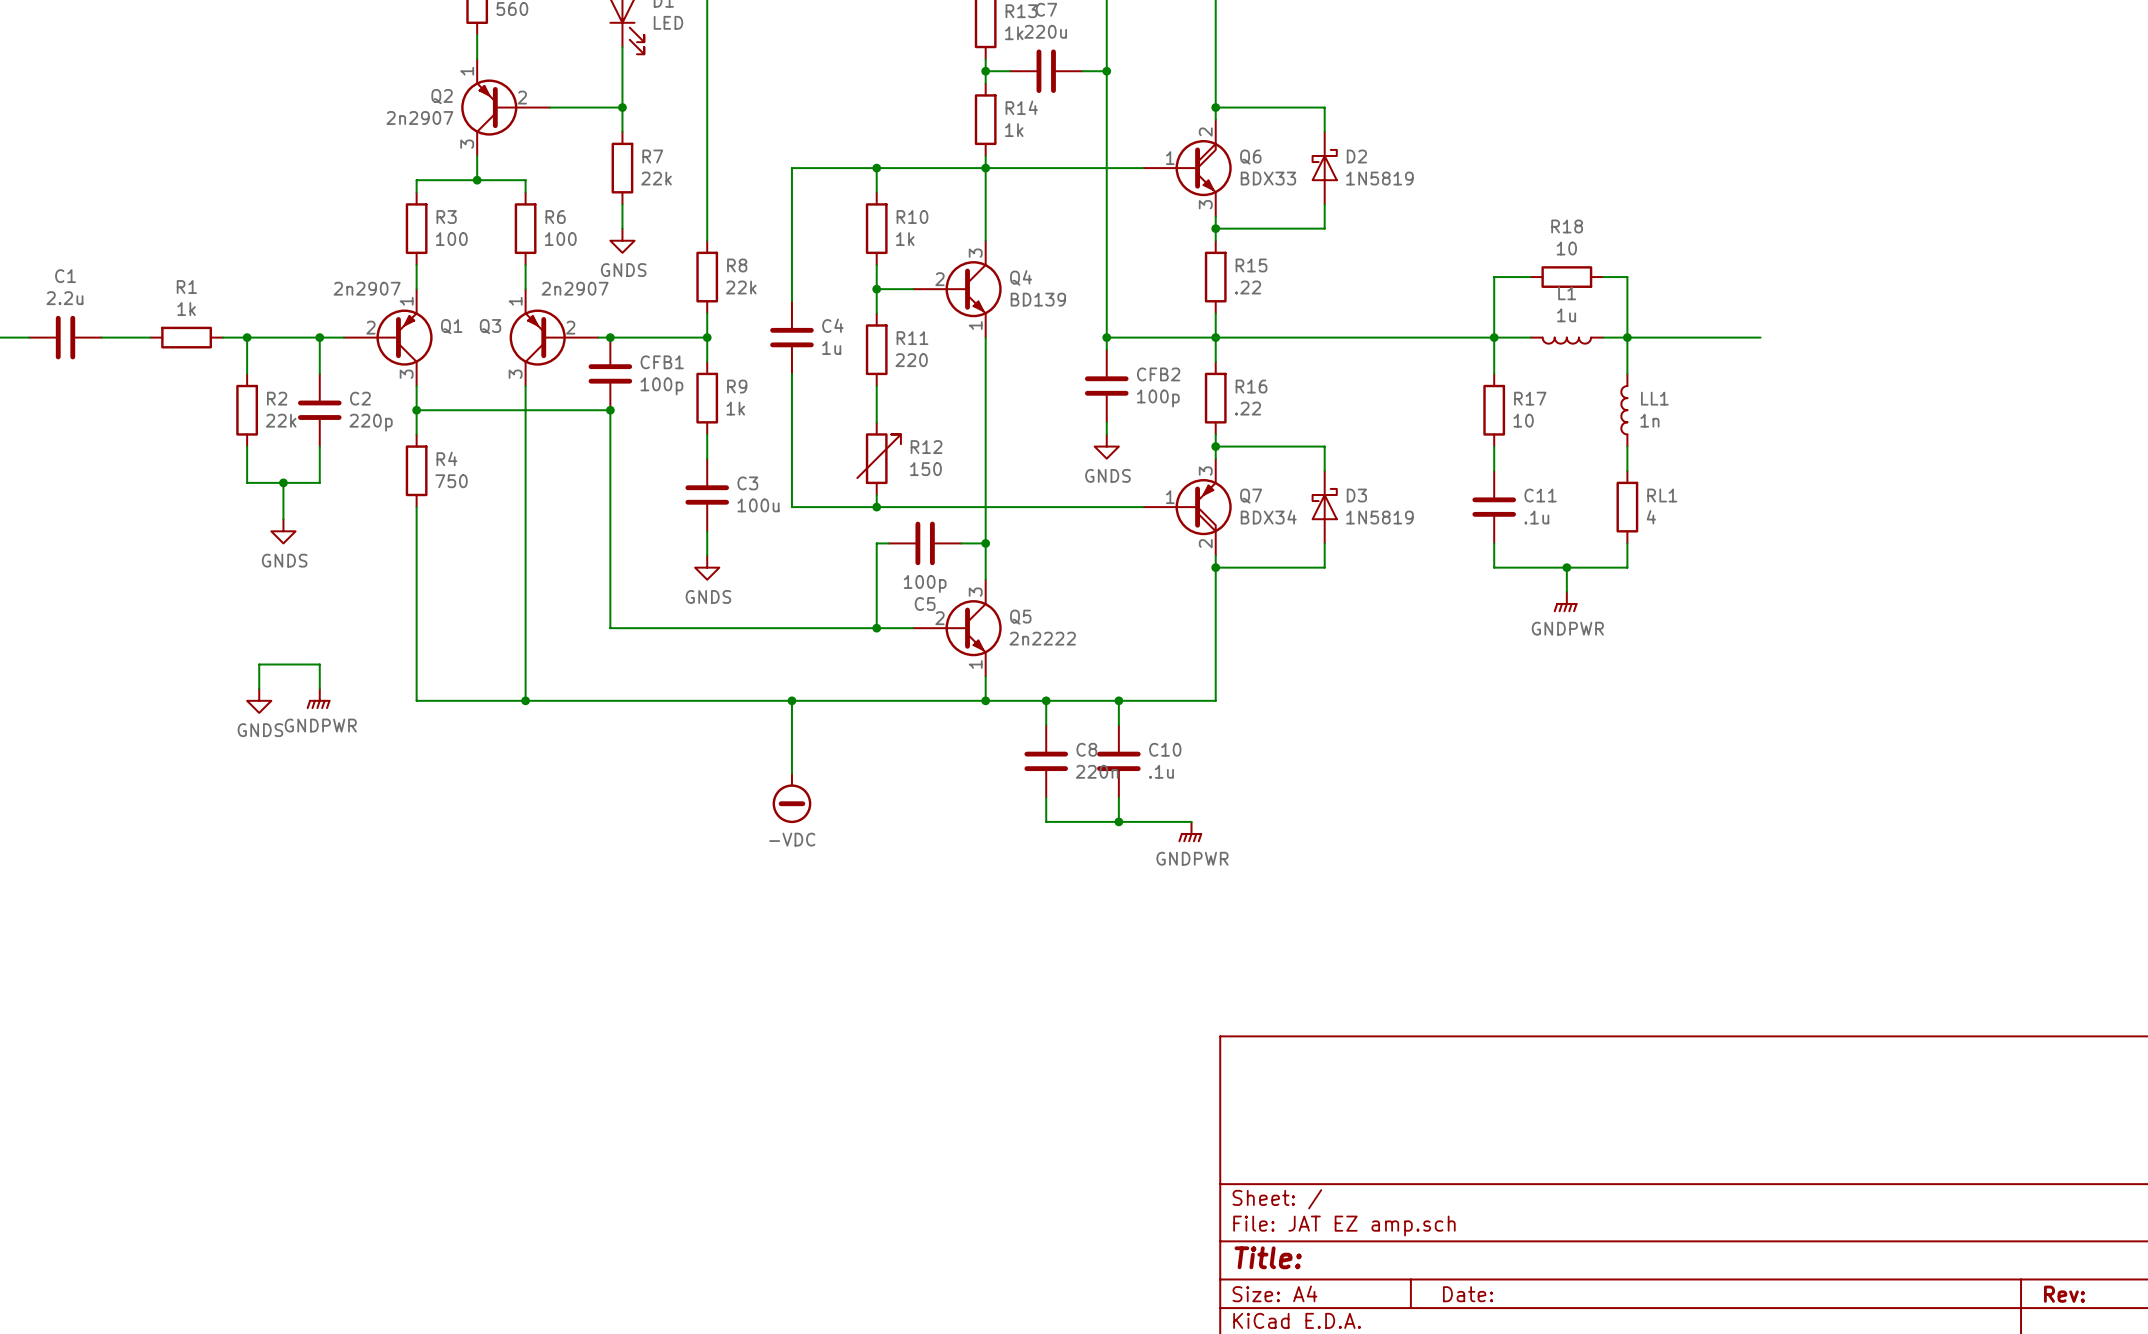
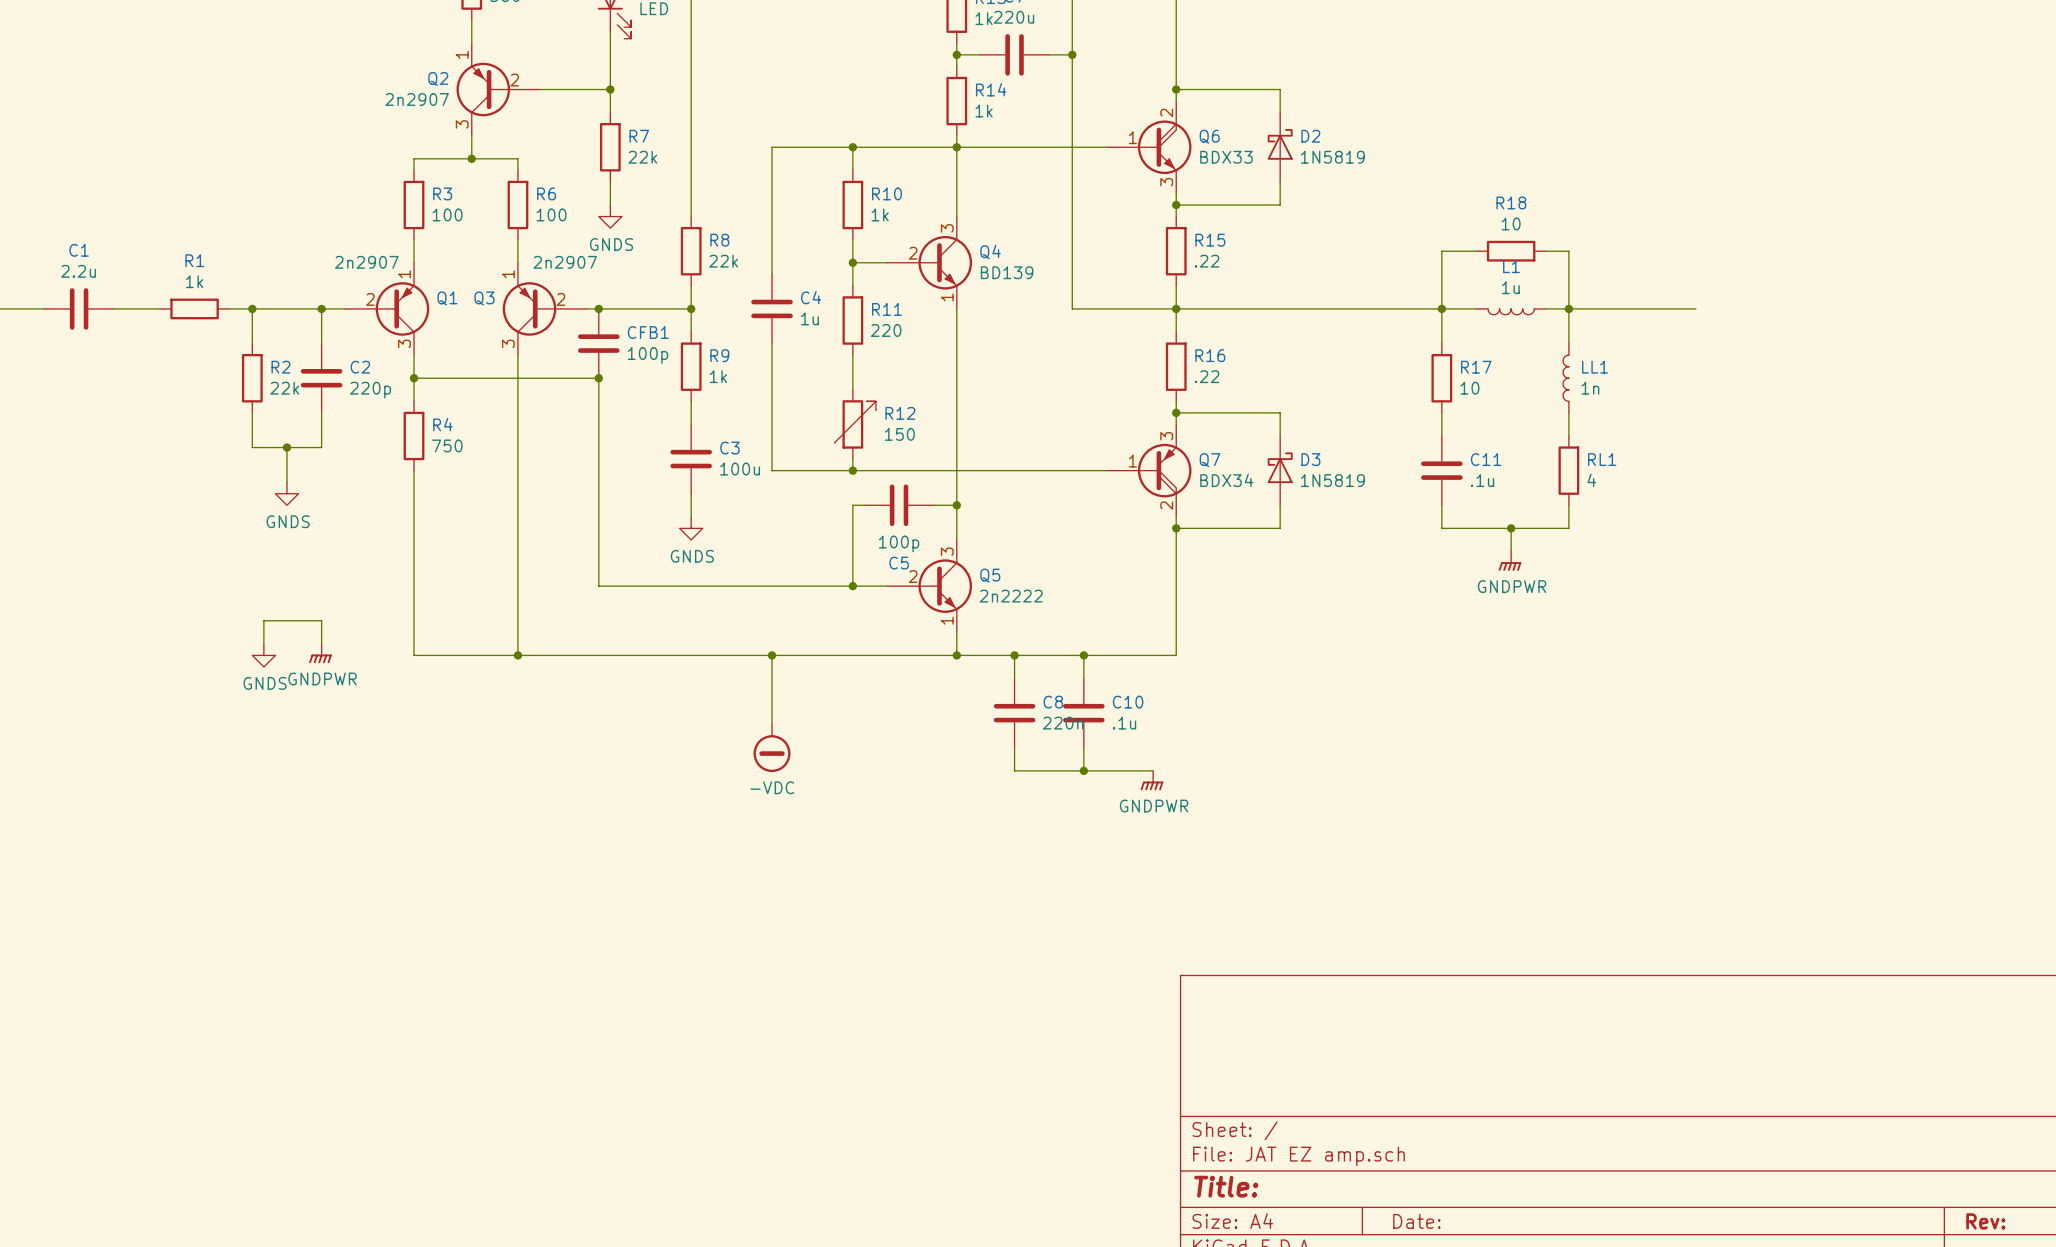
wire: (1106, 337) (1106, 349) -> none
junction: (1106, 337) -> none
CFB2: 100p (1106, 386) -> none
wire: (1106, 422) (1106, 434) -> none
power symbol: GNDS (1106, 446) -> none

